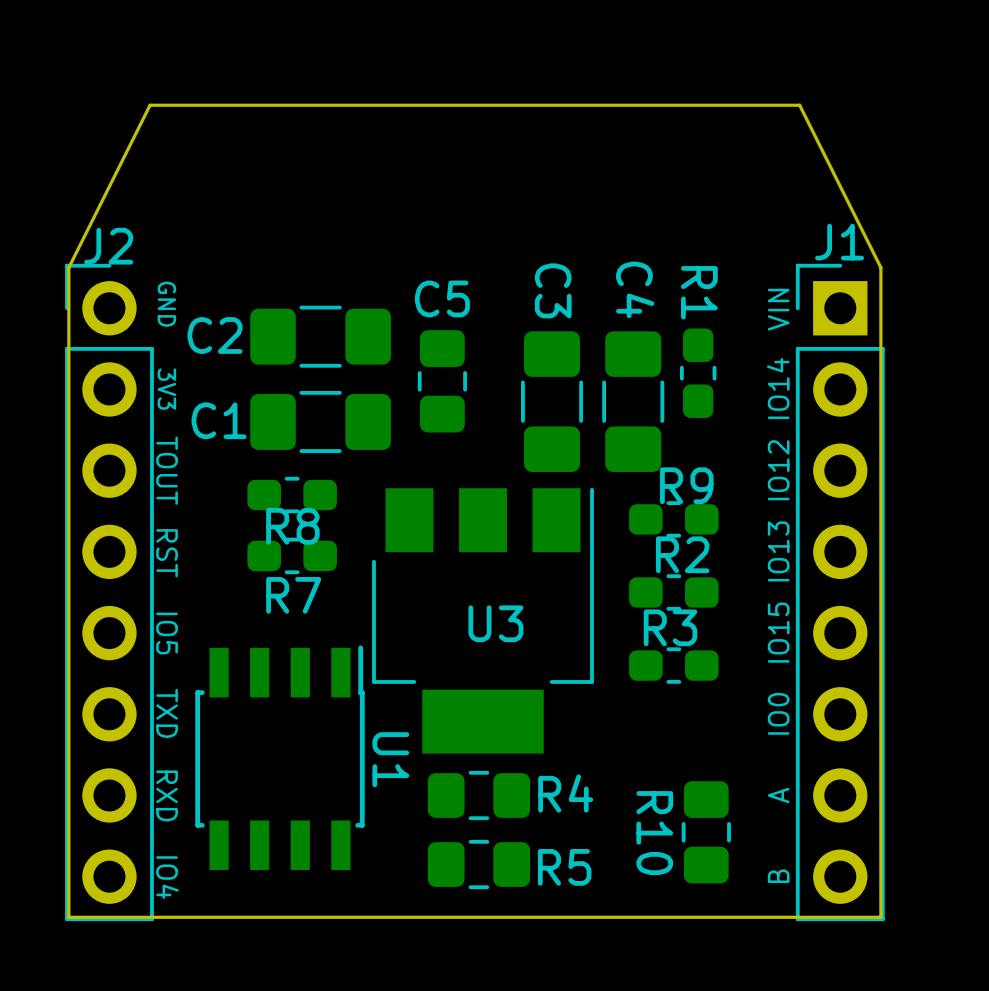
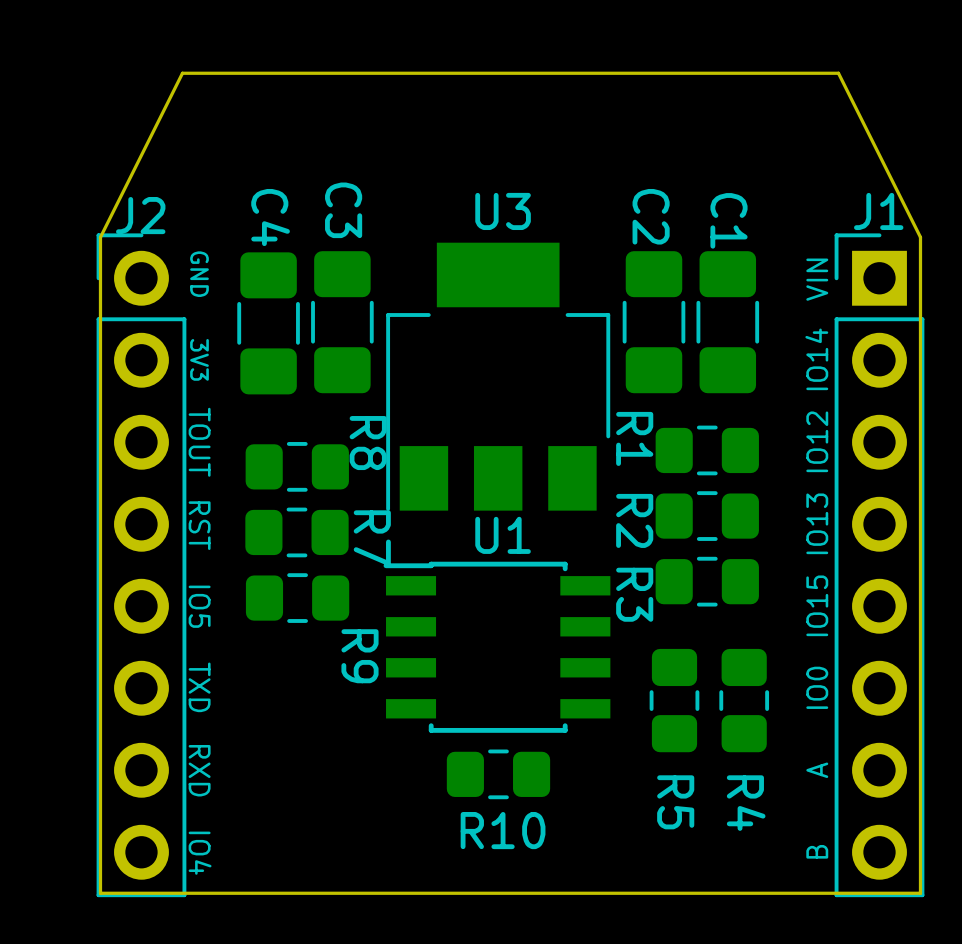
C4 name position: C4 (635, 289) -> C4 (270, 217)
R1 name position: R1 (699, 292) -> R1 (634, 438)
R1 footprint: [679, 328, 717, 418] -> [655, 425, 759, 476]
C2 rotation: 0° (320, 336) -> 90° clockwise (653, 322)
C2 position: (320, 336) -> (653, 322)
C5: (442, 381) -> none
C3 position: (552, 401) -> (342, 322)
C4 position: (633, 401) -> (268, 323)
C1 rotation: 0° (320, 421) -> 90° clockwise (727, 322)
C1 position: (320, 421) -> (727, 322)
R8 footprint: [247, 476, 337, 514] -> [245, 442, 349, 492]
R9 name position: R9 (686, 485) -> R9 (359, 656)
R9 footprint: [629, 501, 719, 538] -> [245, 573, 350, 623]
R8 name position: R8 (292, 526) -> R8 (368, 443)
R7 footprint: [247, 537, 337, 575] -> [245, 507, 349, 558]
R2 name position: R2 (682, 554) -> R2 (634, 520)
R2 footprint: [629, 574, 719, 611] -> [655, 491, 759, 541]
R7 name position: R7 (293, 595) -> R7 (372, 538)
U3 rotation: 0° (483, 620) -> 180° (498, 376)
U3 position: (483, 620) -> (498, 376)
U3 name position: U3 (495, 623) -> U3 (503, 211)
R3 name position: R3 (670, 627) -> R3 (634, 594)
R3 footprint: [629, 647, 719, 684] -> [655, 556, 759, 607]
U1 rotation: 0° (279, 757) -> 90° counterclockwise (496, 647)
U1 position: (279, 757) -> (496, 647)
R4 rotation: 0° (478, 795) -> 90° clockwise (744, 700)
R4 position: (478, 795) -> (744, 700)
R10 rotation: 0° (706, 832) -> 90° clockwise (498, 774)
R10 position: (706, 832) -> (498, 774)
R10 name position: R10 (654, 833) -> R10 (503, 830)
R5 rotation: 0° (478, 864) -> 90° clockwise (674, 700)
R5 position: (478, 864) -> (674, 700)

